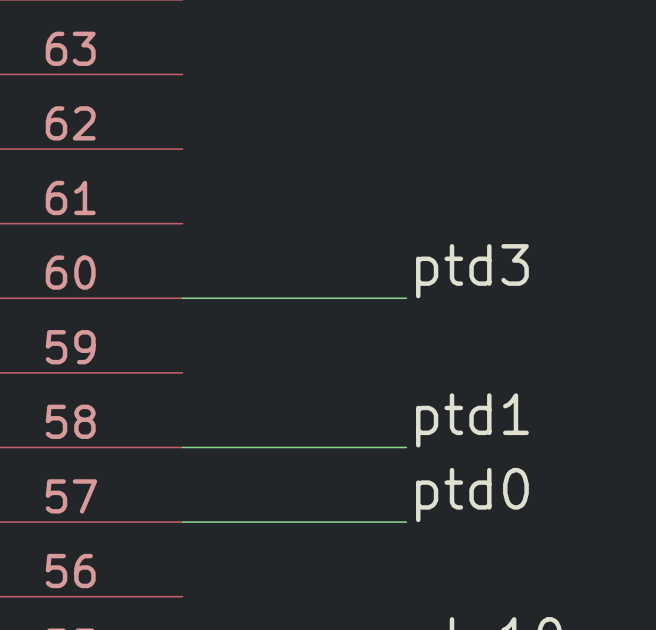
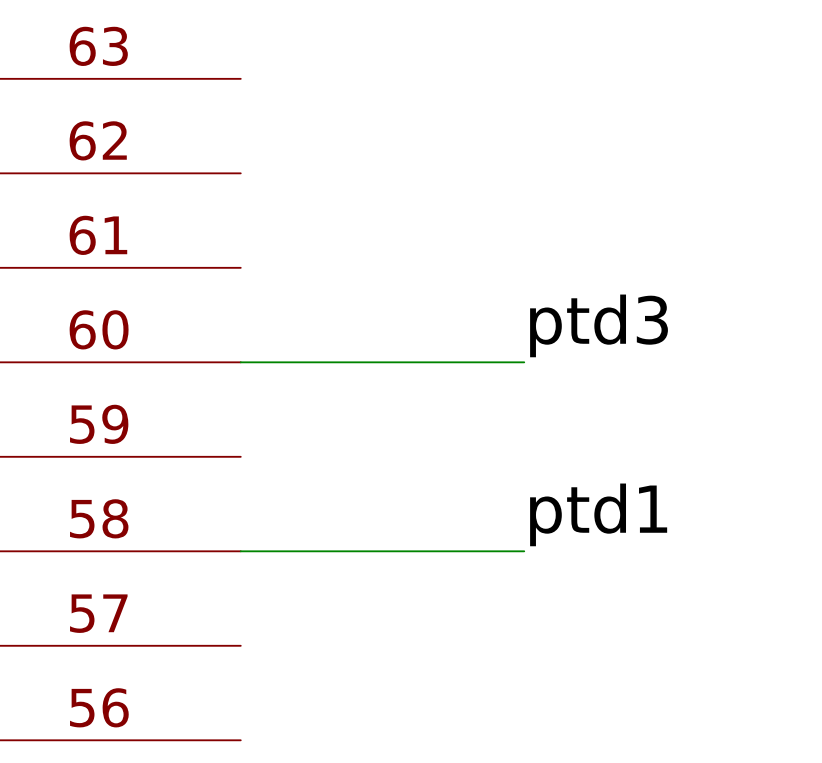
label: ptd0 (472, 495) -> none
wire: (182, 522) (406, 522) -> none

